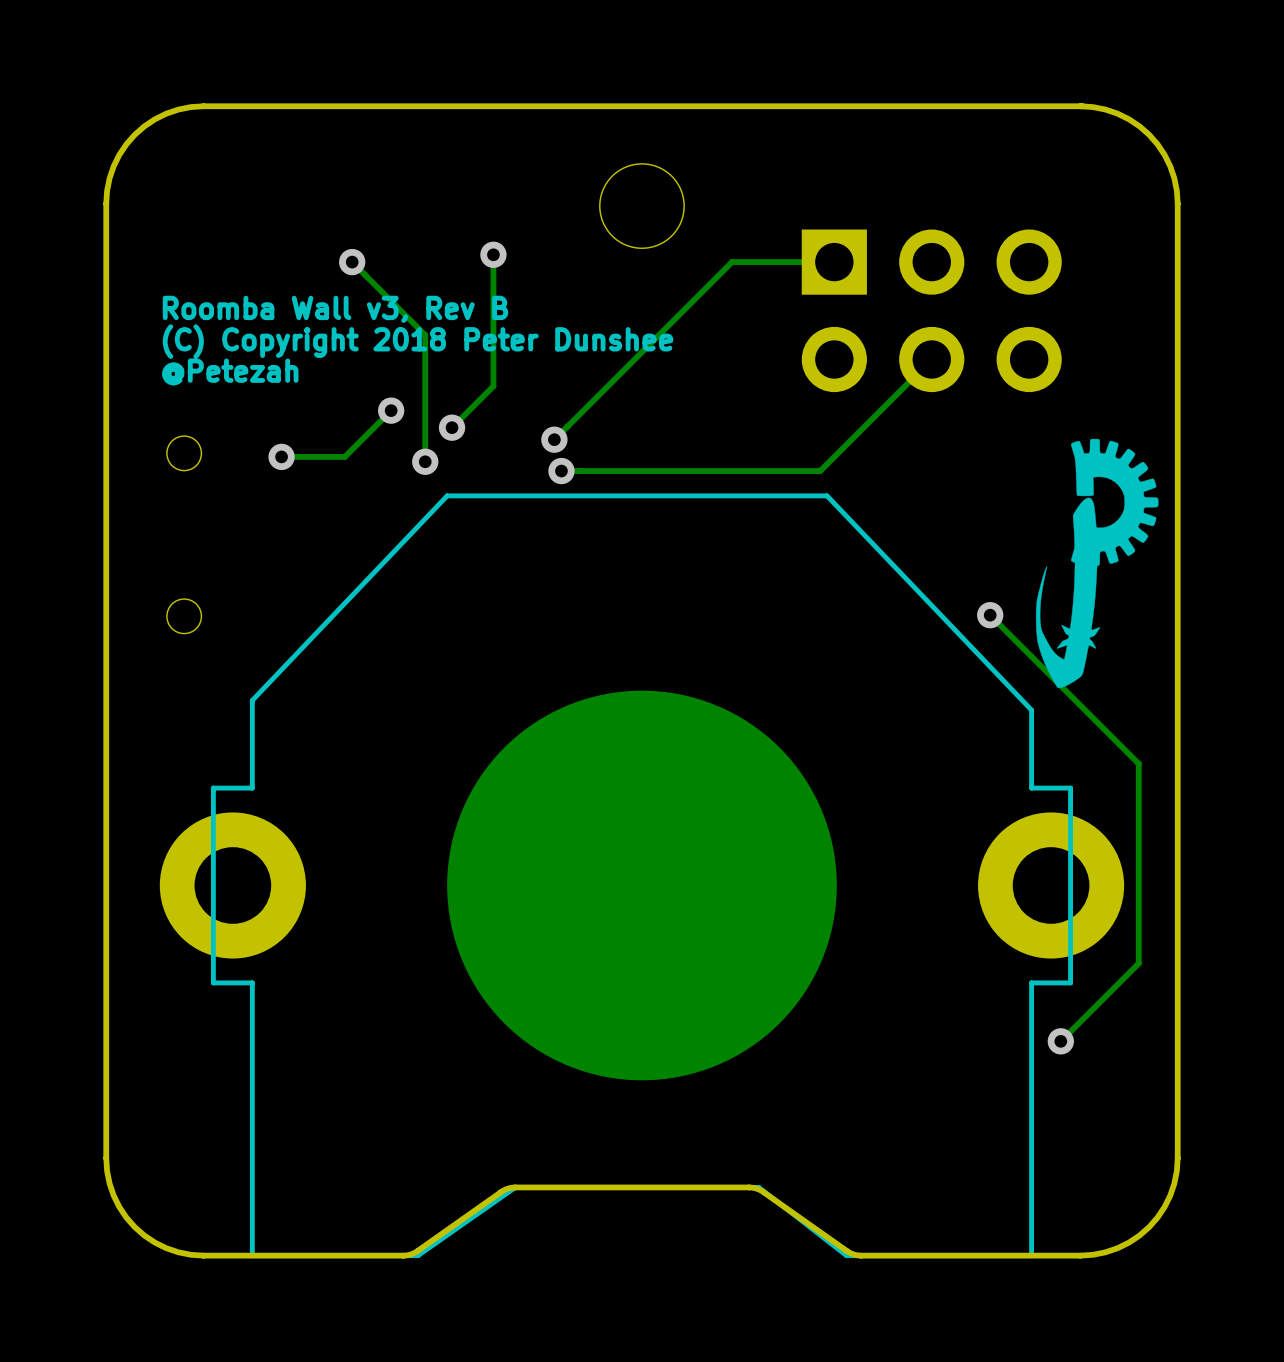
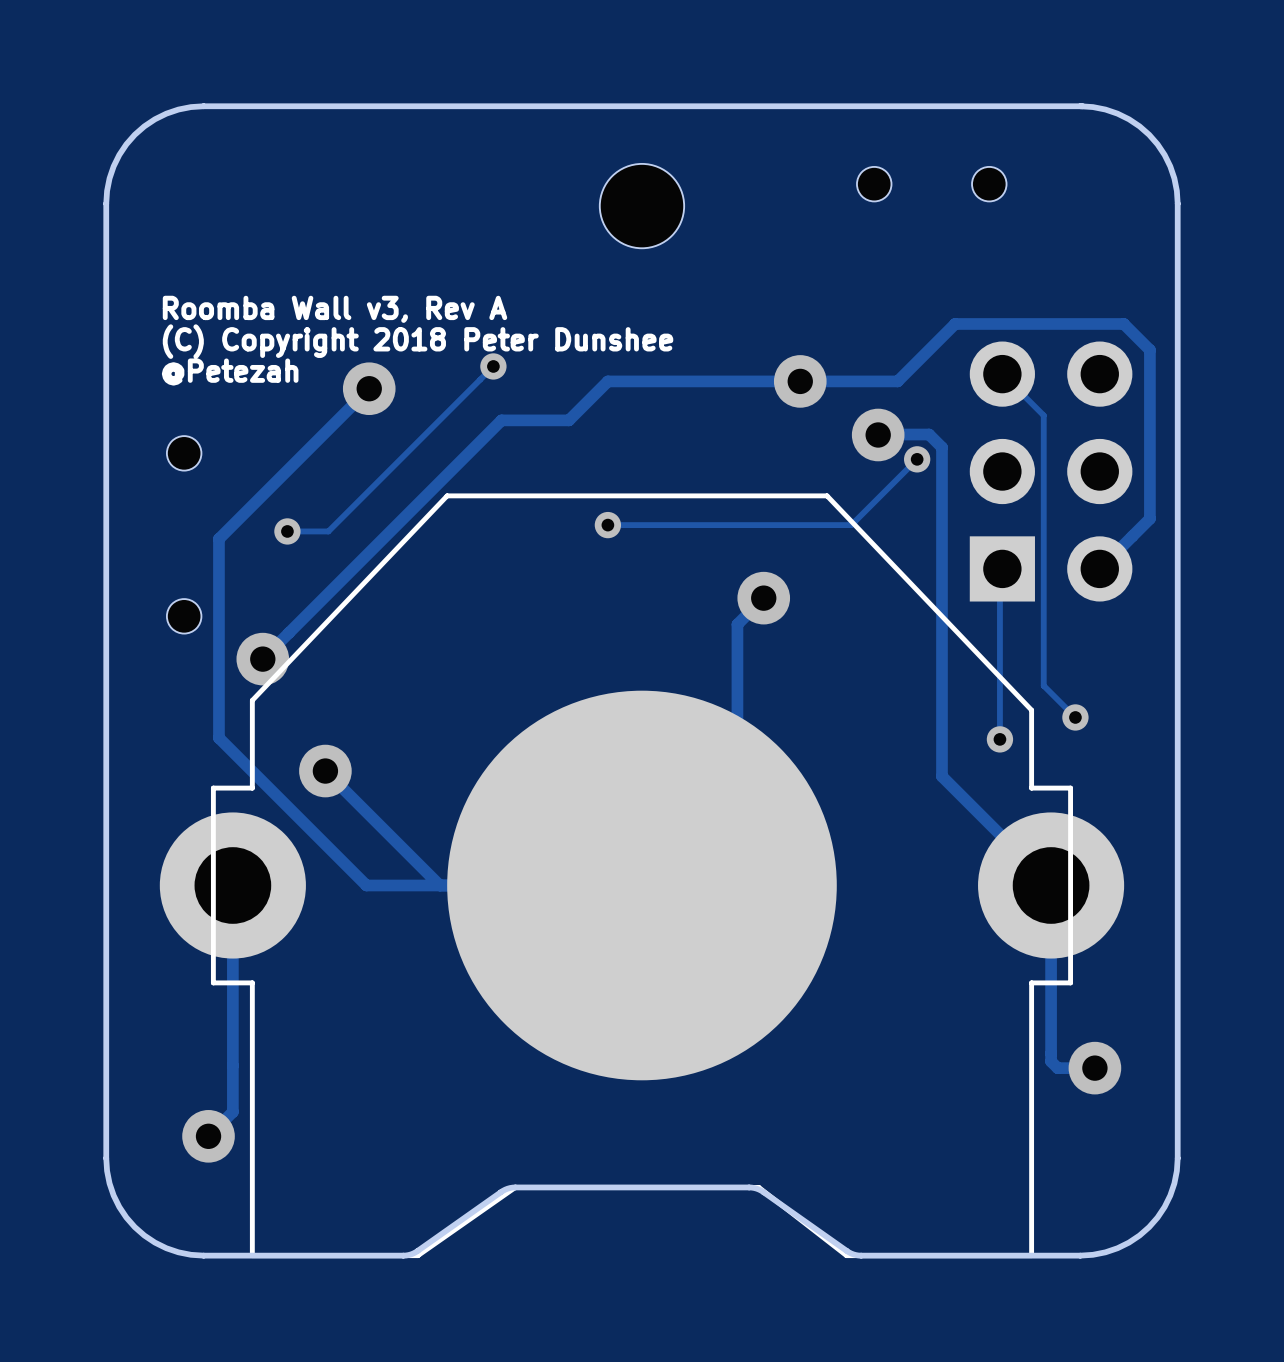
part: none -> (931, 184)
track: (493, 254) (493, 386) (452, 427) -> none
via: (493, 254) -> none
track: (352, 262) (425, 335) (425, 461) -> none
via: (352, 262) -> none
track: (834, 262) (731, 262) (554, 439) -> none
text: Roomba Wall v3, Rev B (335, 309) -> Roomba Wall v3, Rev A (334, 309)
part rotation: 0° (931, 310) -> 90° counterclockwise (1051, 471)
part position: (931, 310) -> (1051, 471)
track: (931, 359) (820, 471) (561, 471) -> none
track: none -> (493, 366) (328, 531) (287, 531)
via: none -> (493, 366)
track: none -> (1002, 374) (1043, 415) (1043, 685) (1075, 717)
via: none -> (800, 381)
track: none -> (369, 388) (218, 539) (218, 737) (366, 885) (641, 885) (737, 790) (737, 624) (763, 598)
via size: [378, 397, 405, 424] -> [342, 362, 396, 416]
track: (391, 410) (344, 456) (281, 456) -> none
via: (452, 427) -> none
track: none -> (878, 434) (929, 434) (941, 447) (941, 776) (1051, 885) (1051, 1061) (1057, 1068) (1094, 1068)
via: none -> (878, 434)
drawing: [1035, 438, 1159, 689] -> none
via: (554, 439) -> none
via position: (281, 456) -> (287, 531)
track: none -> (917, 459) (851, 525) (607, 525)
via: none -> (917, 459)
via: (425, 461) -> none
via: (561, 471) -> none
via: none -> (607, 525)
track: none -> (1002, 568) (999, 571) (999, 739)
track: none -> (1099, 568) (1149, 518) (1149, 350) (1123, 323) (955, 323) (897, 381) (607, 381) (568, 420) (501, 420) (262, 659)
via: none -> (763, 598)
track: (990, 615) (1138, 763) (1138, 963) (1060, 1041) -> none
via: (990, 615) -> none
via: none -> (262, 659)
via: none -> (1075, 717)
via: none -> (999, 739)
track: none -> (325, 771) (439, 885)
via: none -> (325, 771)
track: none -> (232, 885) (232, 1111) (208, 1136)
via: (1060, 1041) -> none
via: none -> (1094, 1068)
via: none -> (208, 1136)

